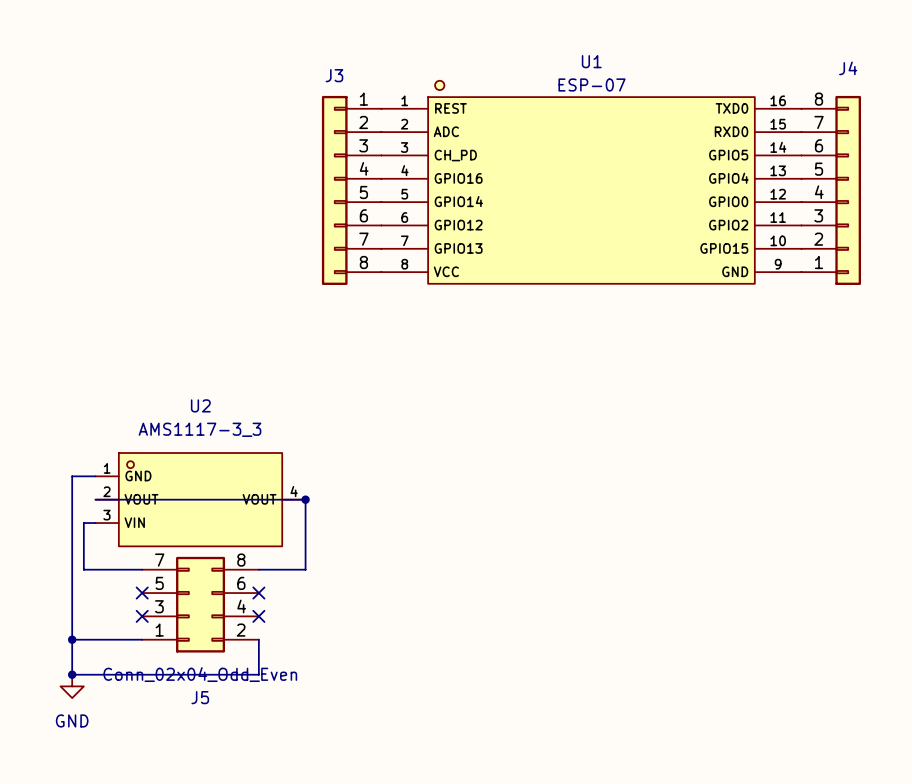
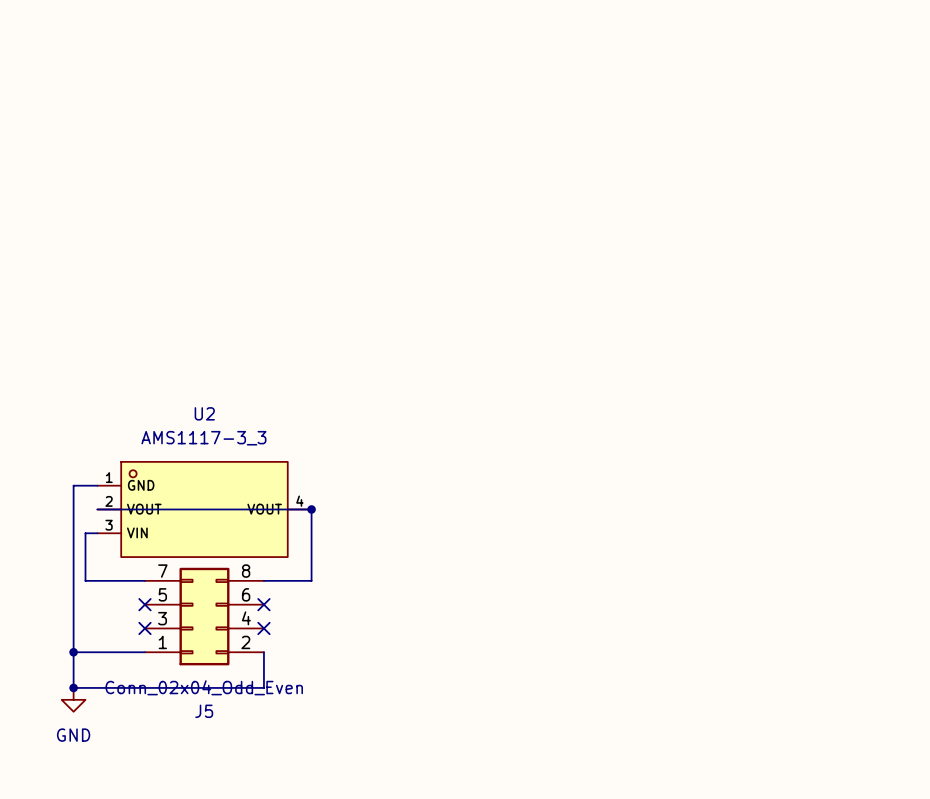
U1: ESP-07 (591, 182) -> none
J3: (351, 190) -> none
J4: (831, 190) -> none

